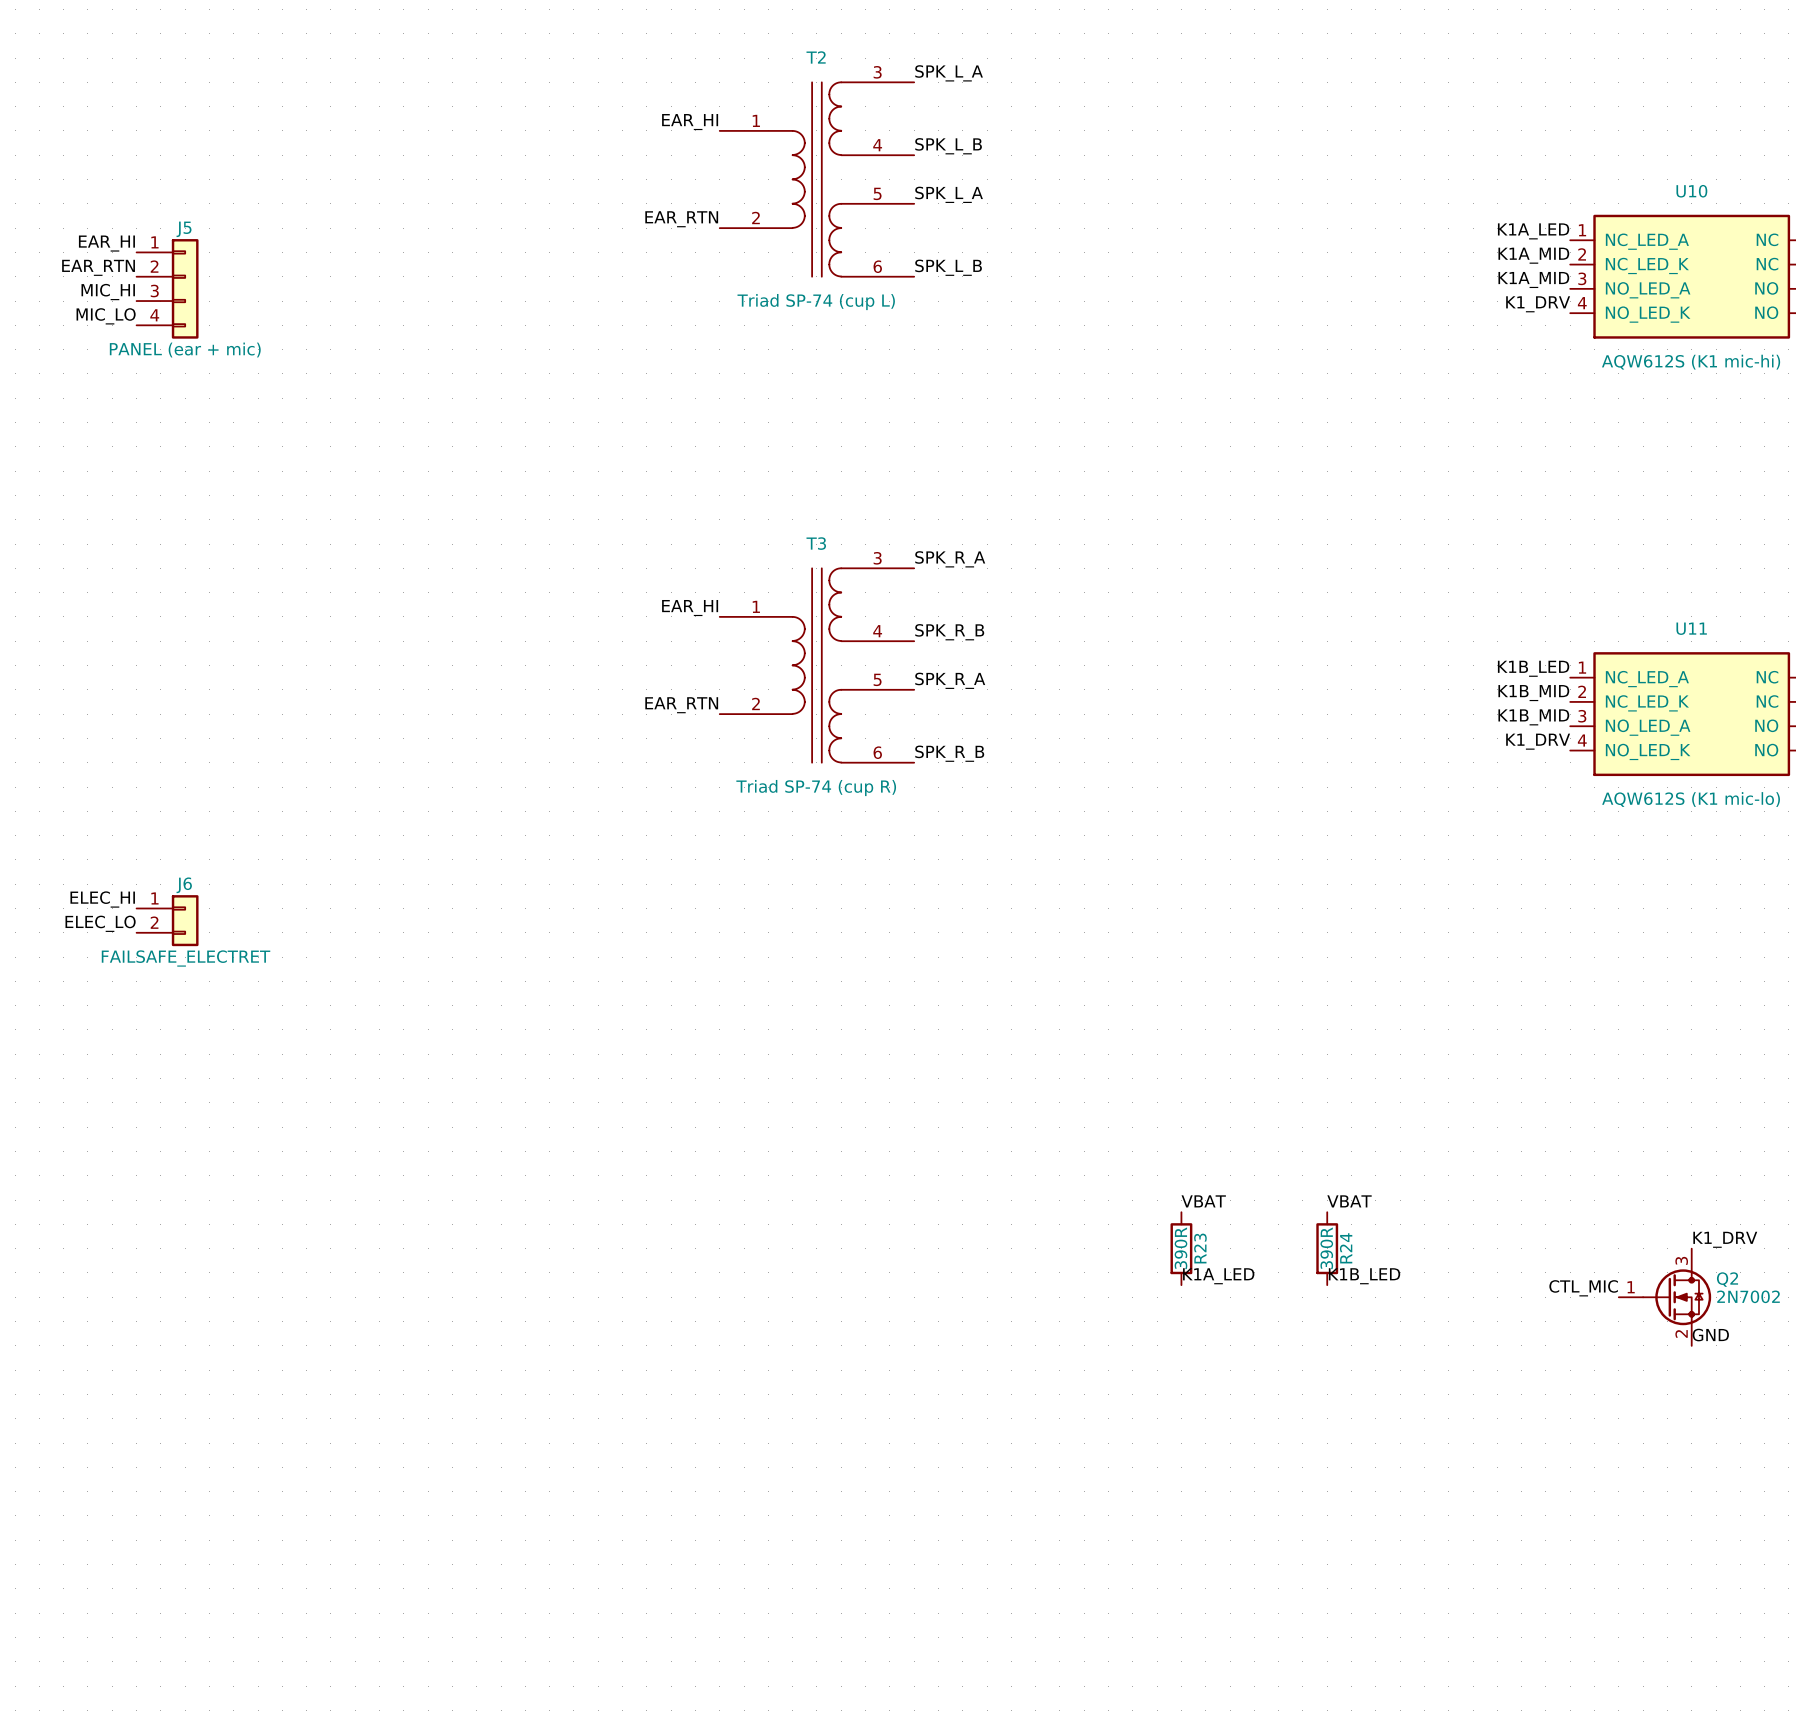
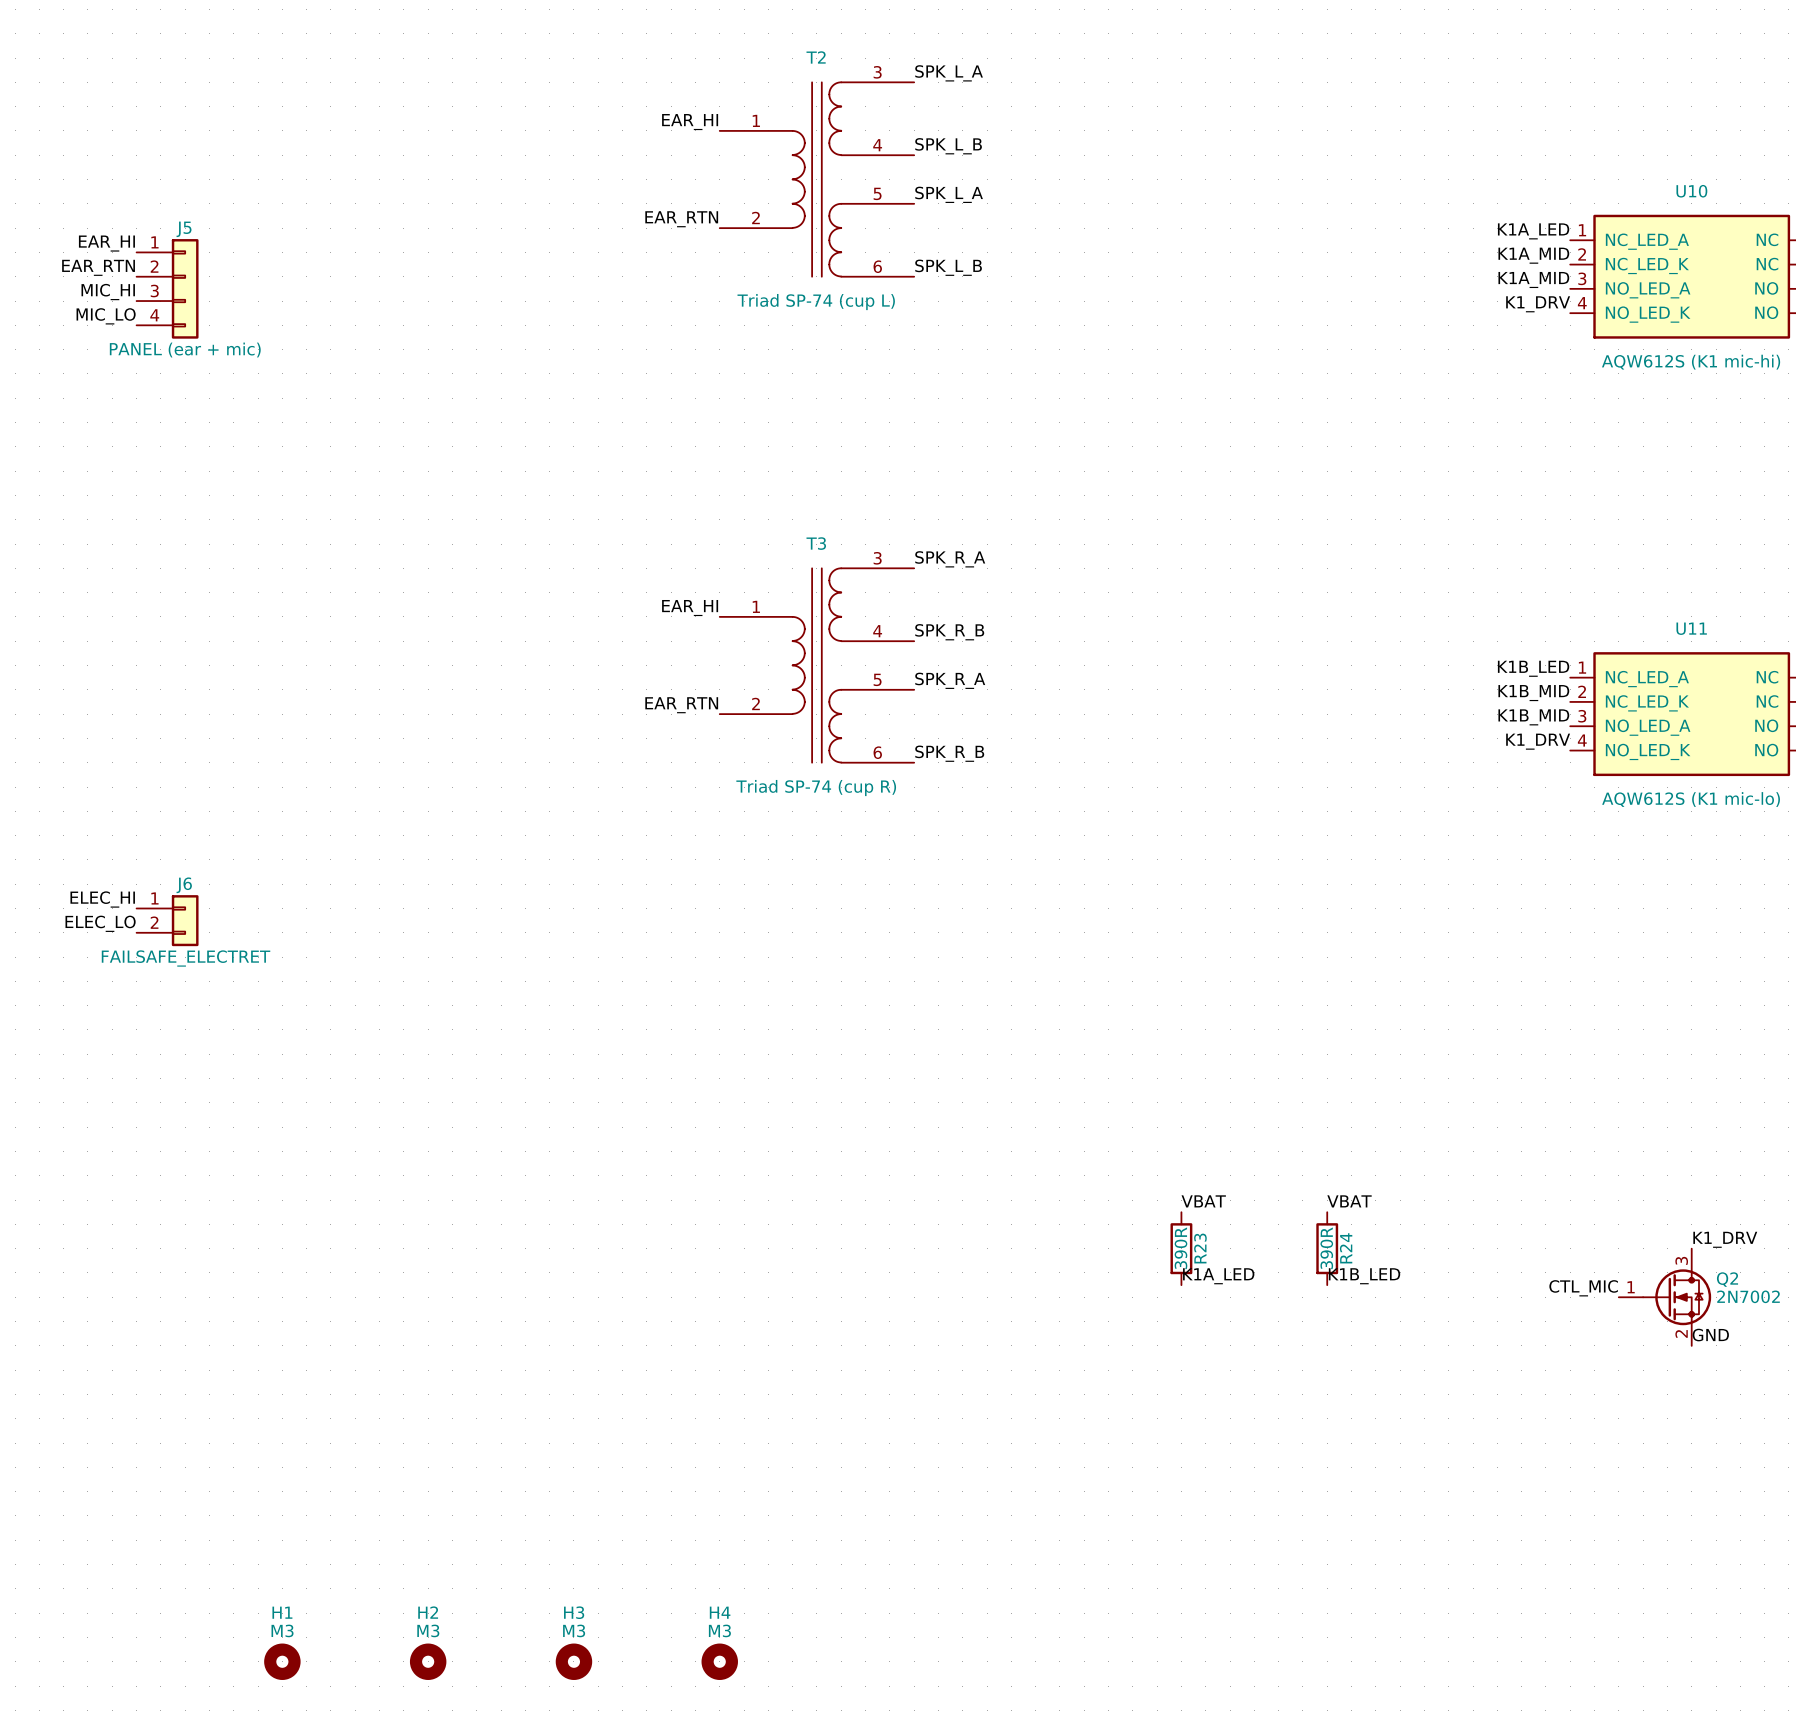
H1: none -> M3 (282, 1661)
H2: none -> M3 (428, 1661)
H3: none -> M3 (573, 1661)
H4: none -> M3 (719, 1661)

